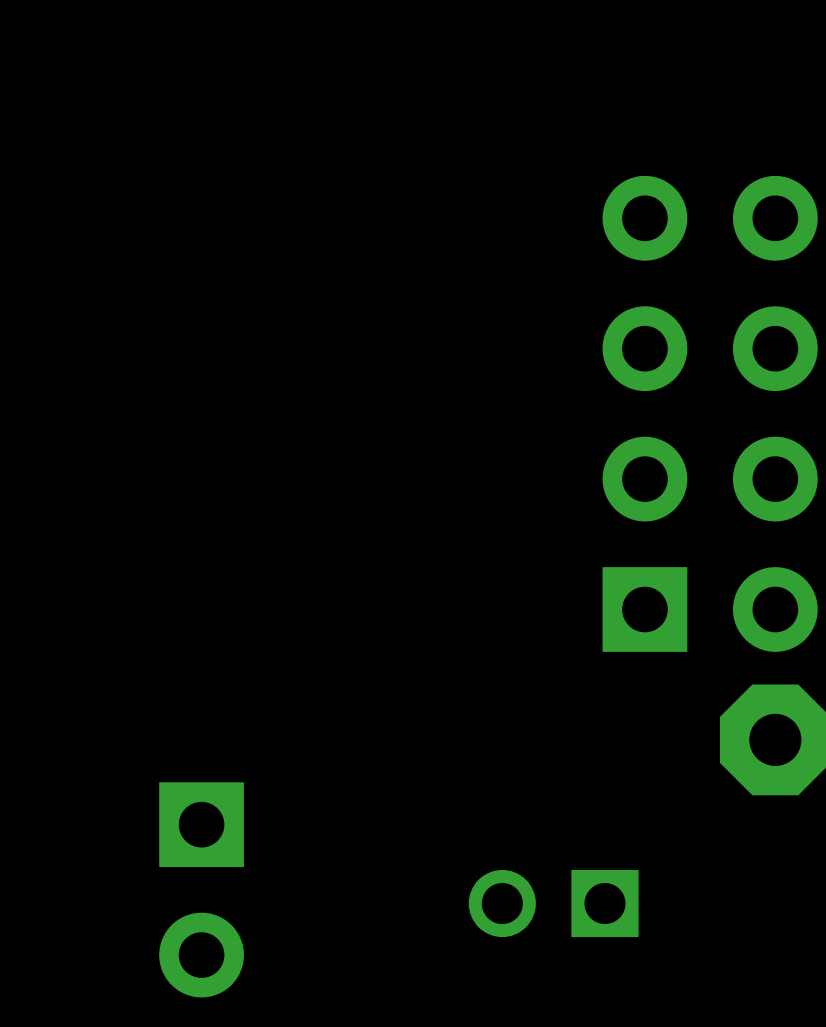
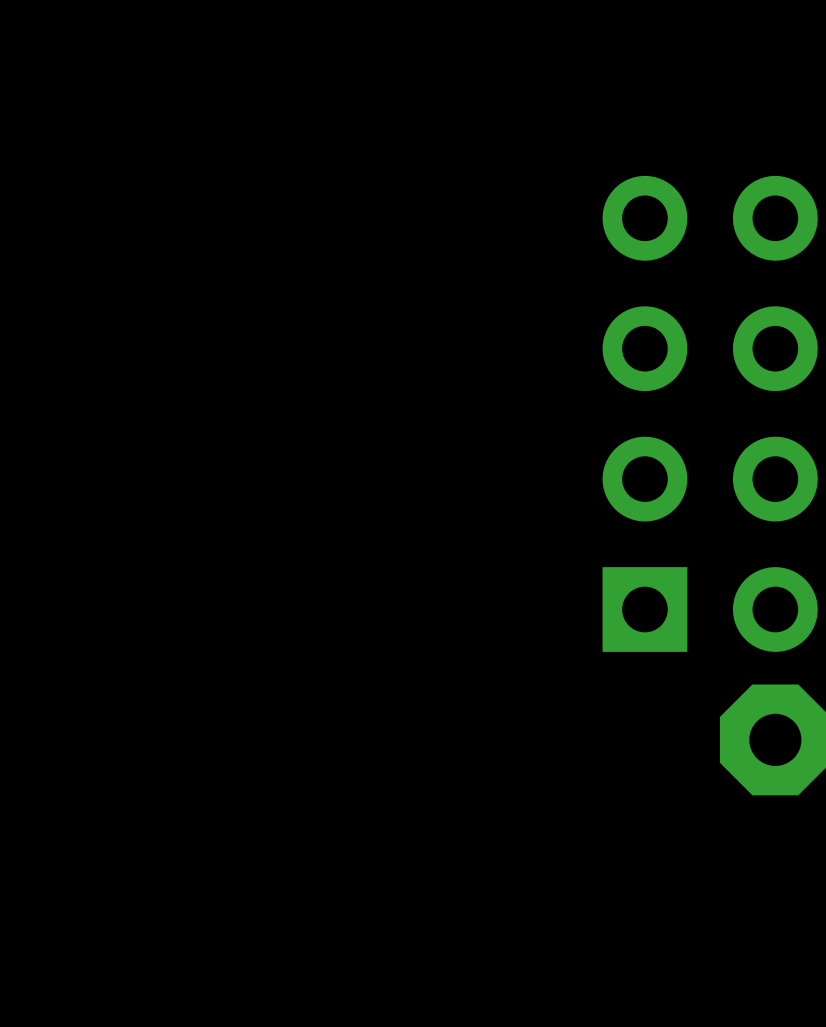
part: (201, 889) -> none
part: (553, 903) -> none

